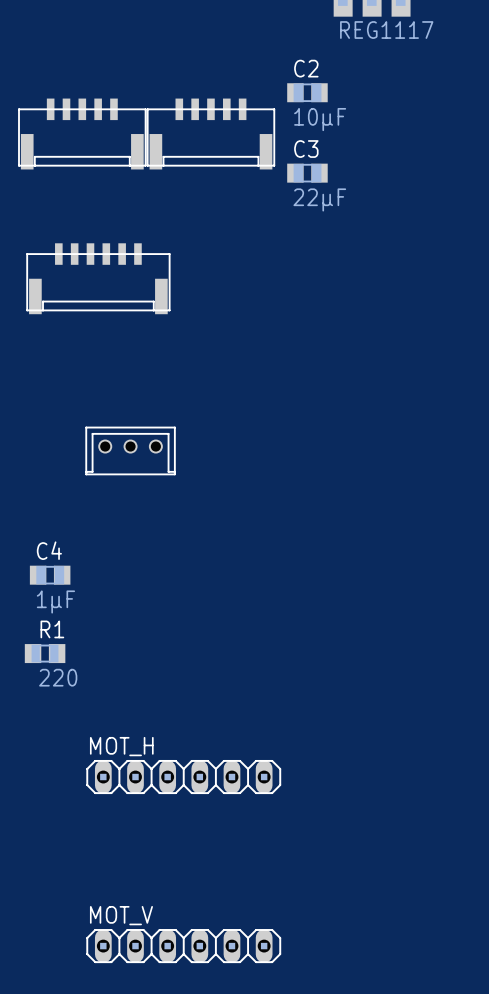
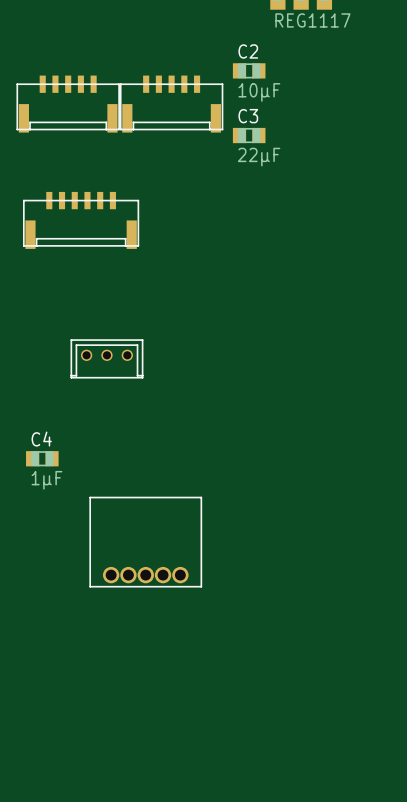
R1: 220 (45, 653) -> none
part: none -> (145, 542)
MOT_H: (183, 777) -> none
MOT_V: (183, 946) -> none

